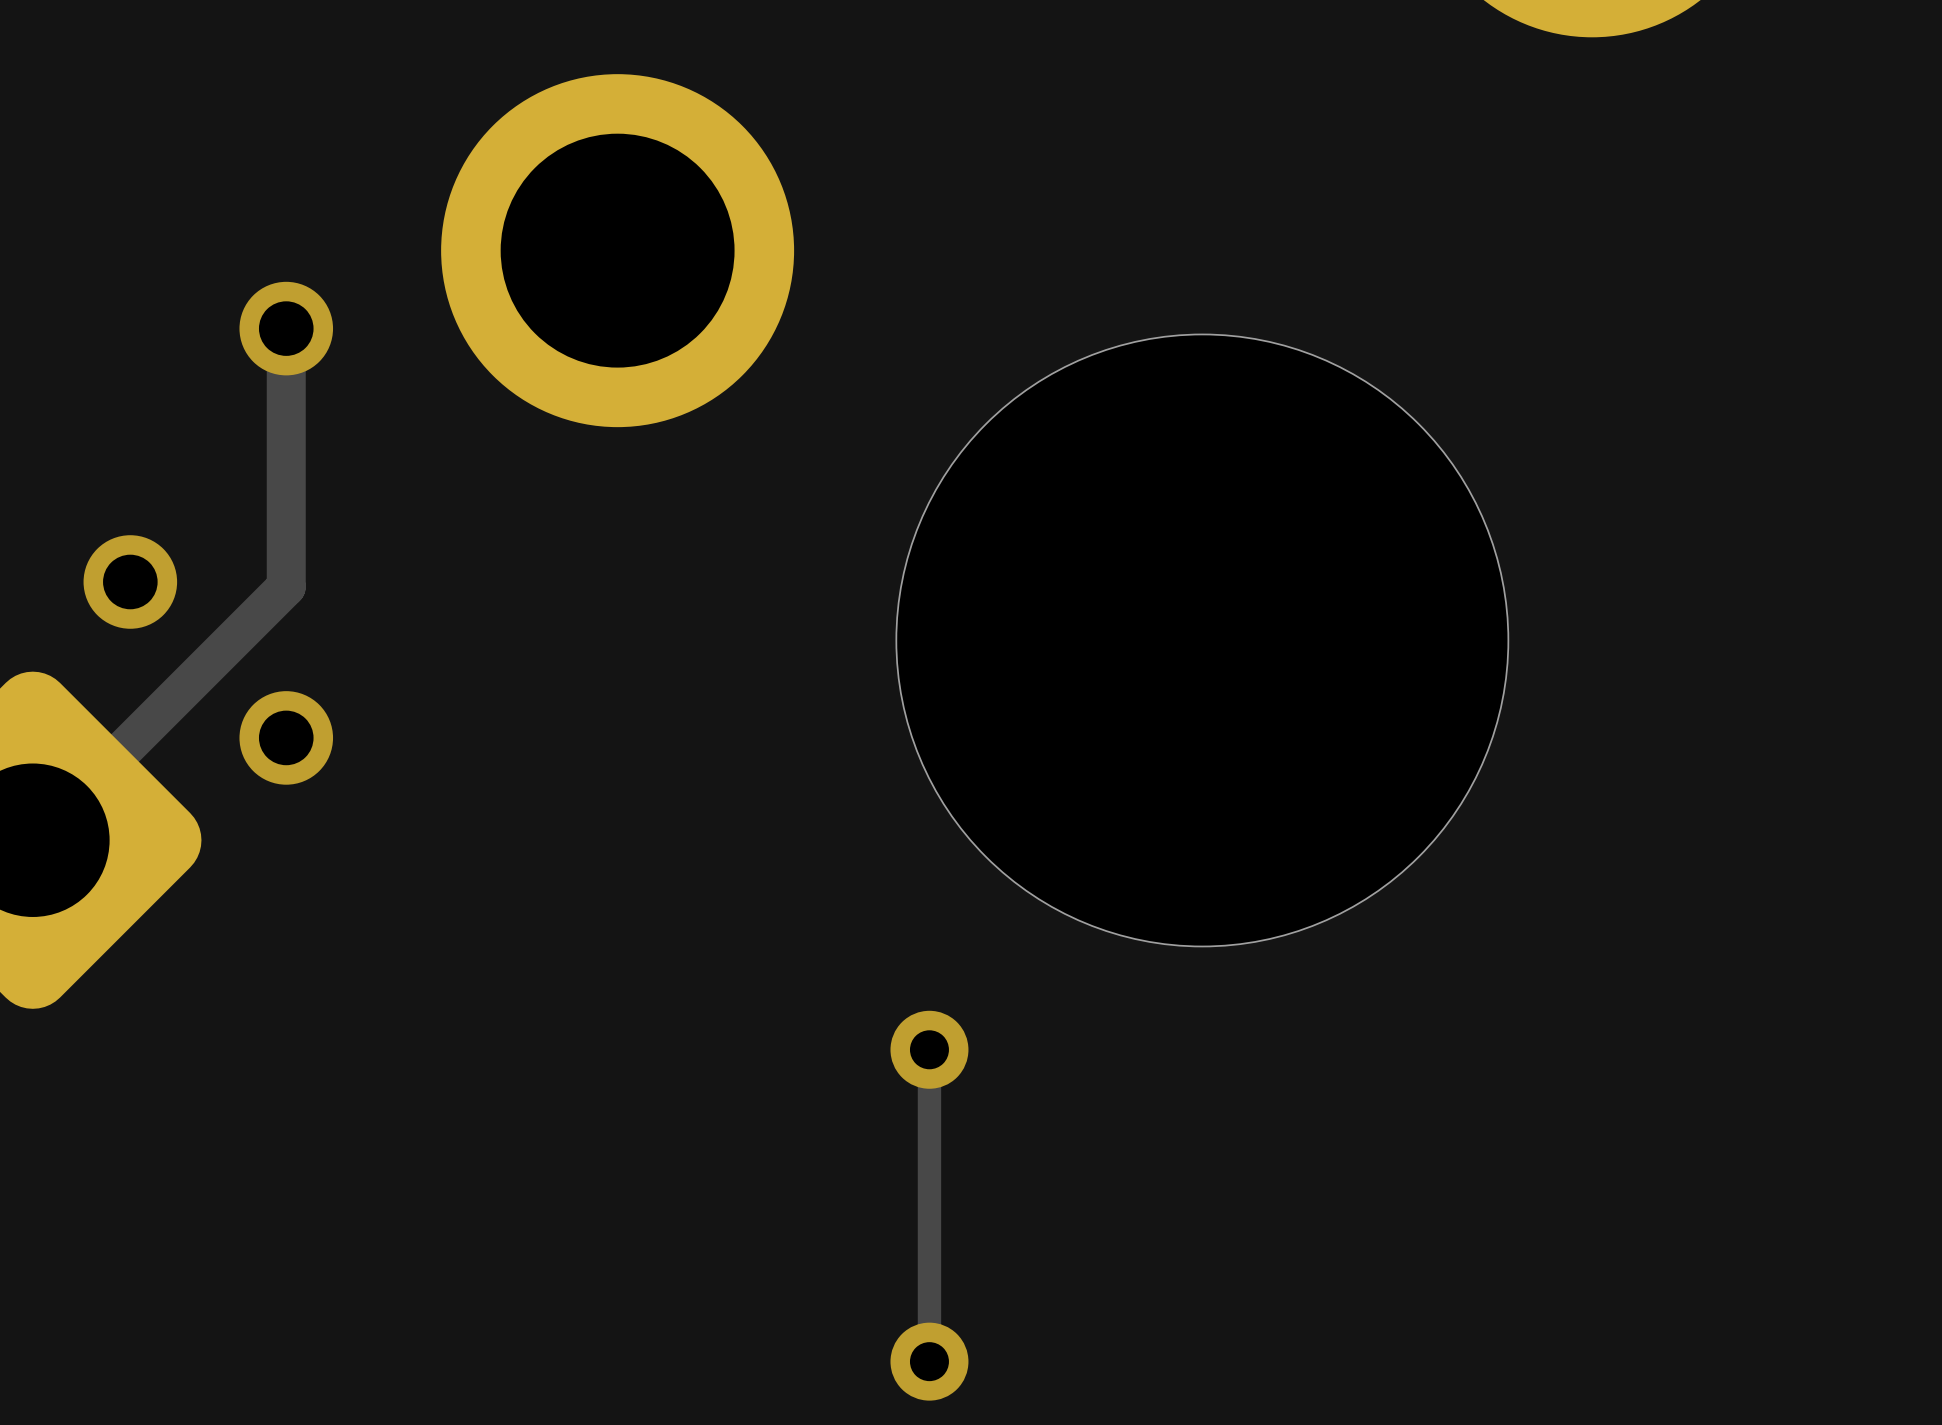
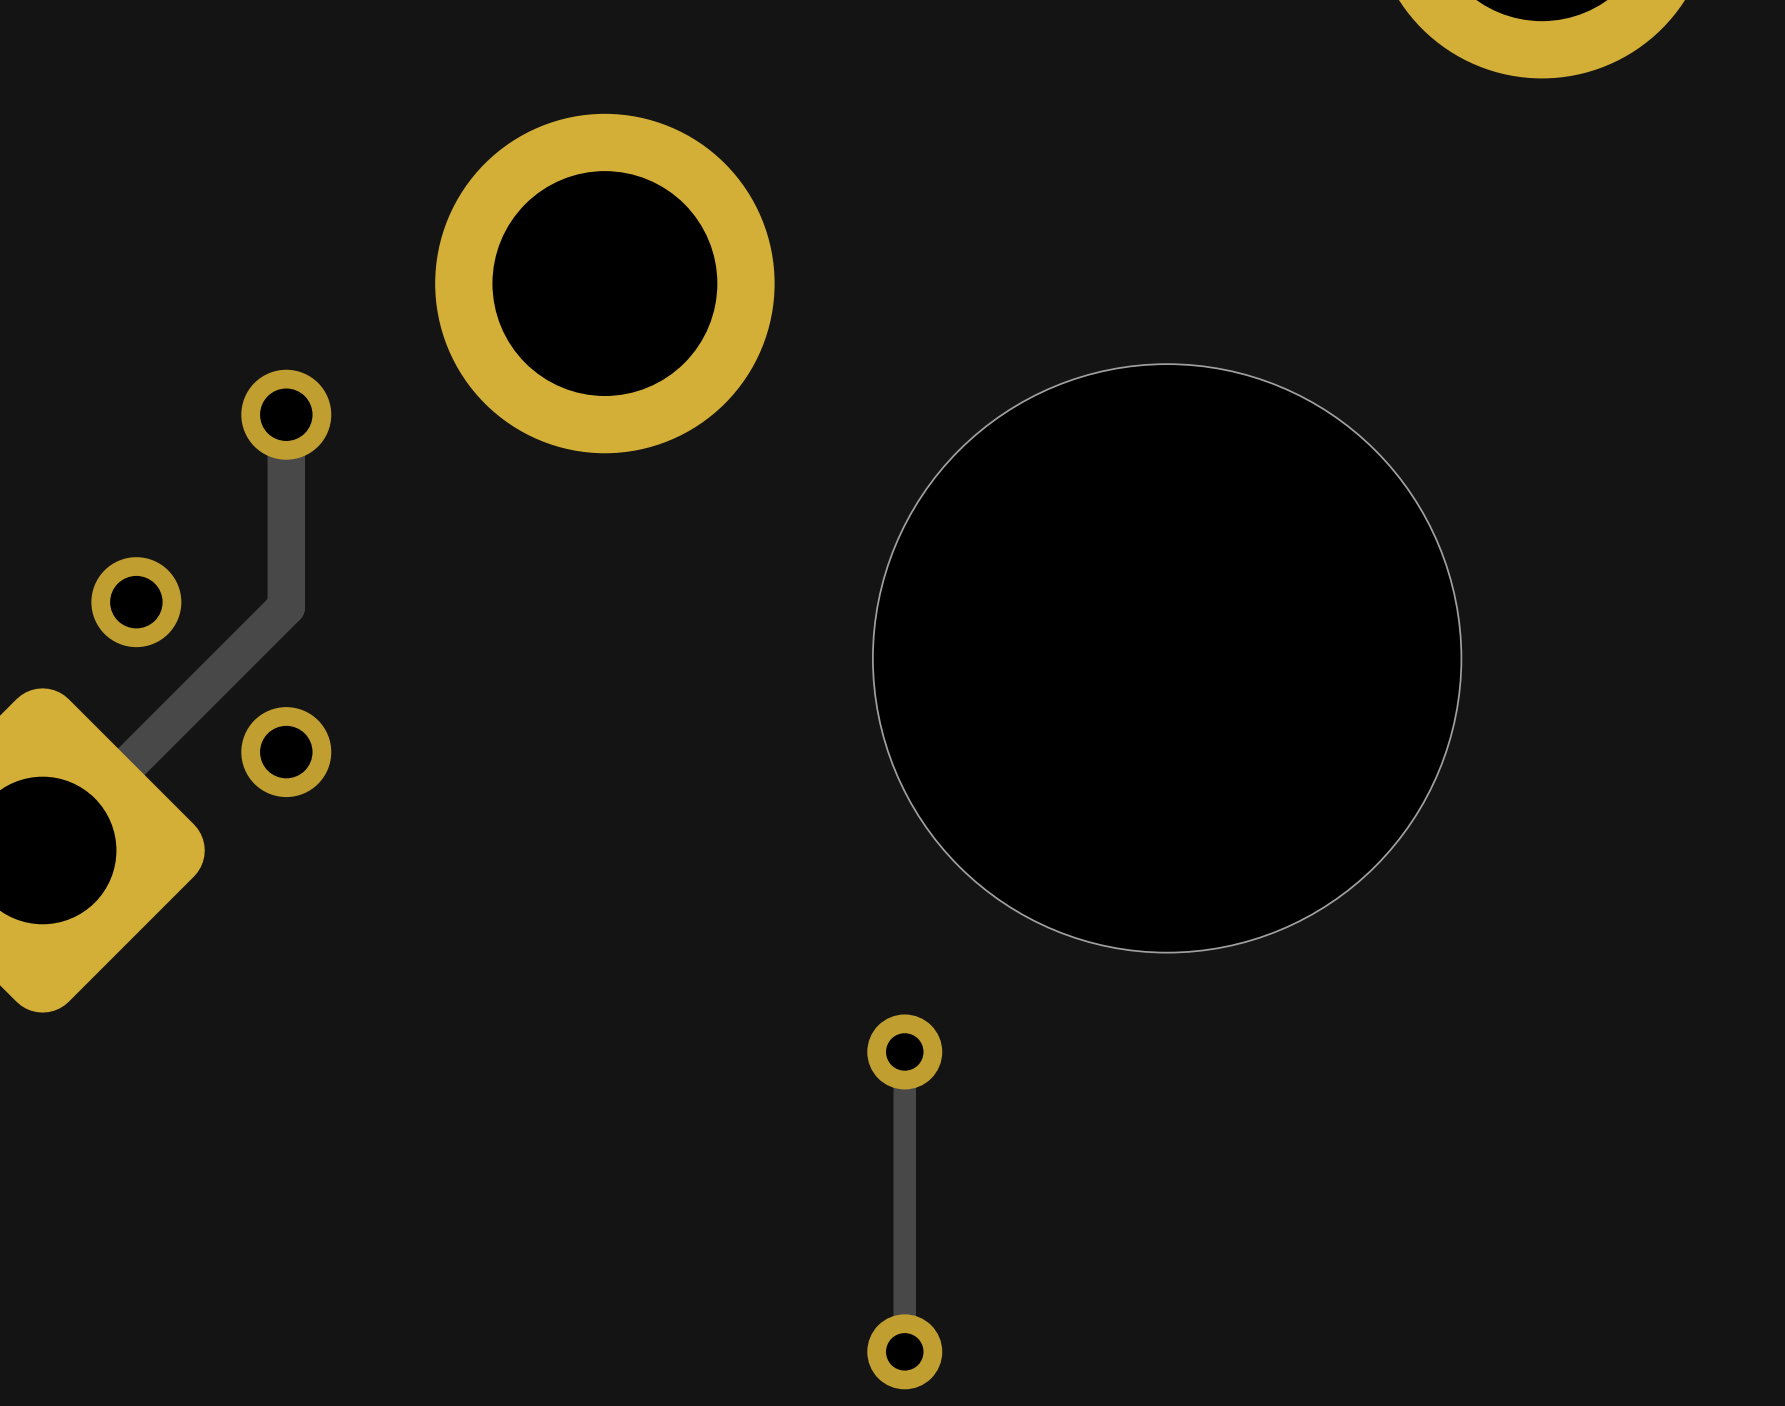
via position: (286, 328) -> (286, 414)

